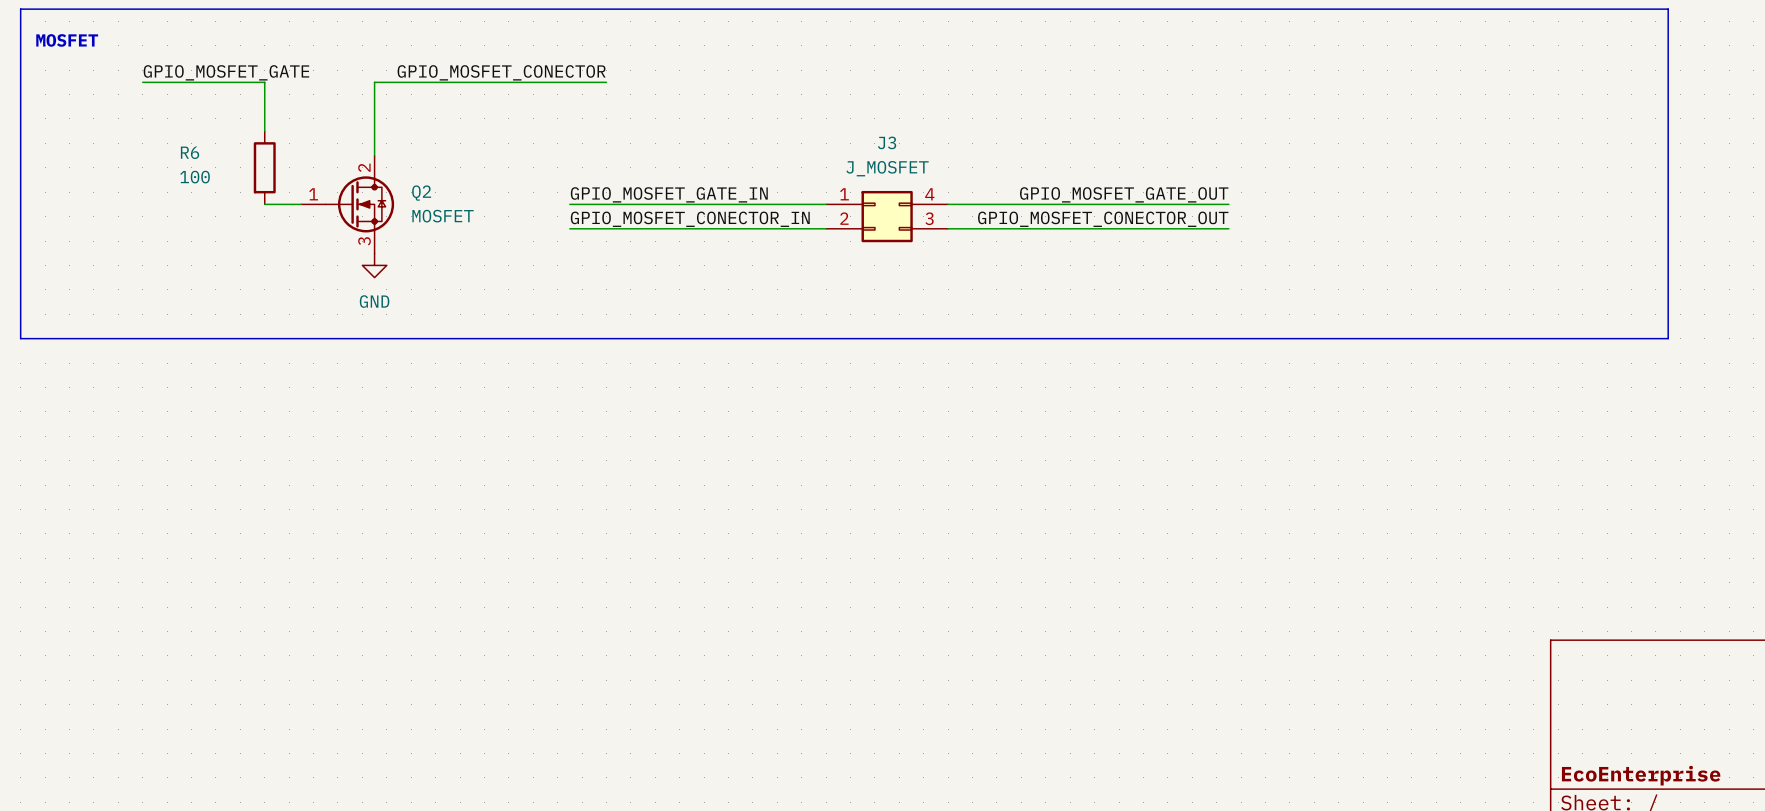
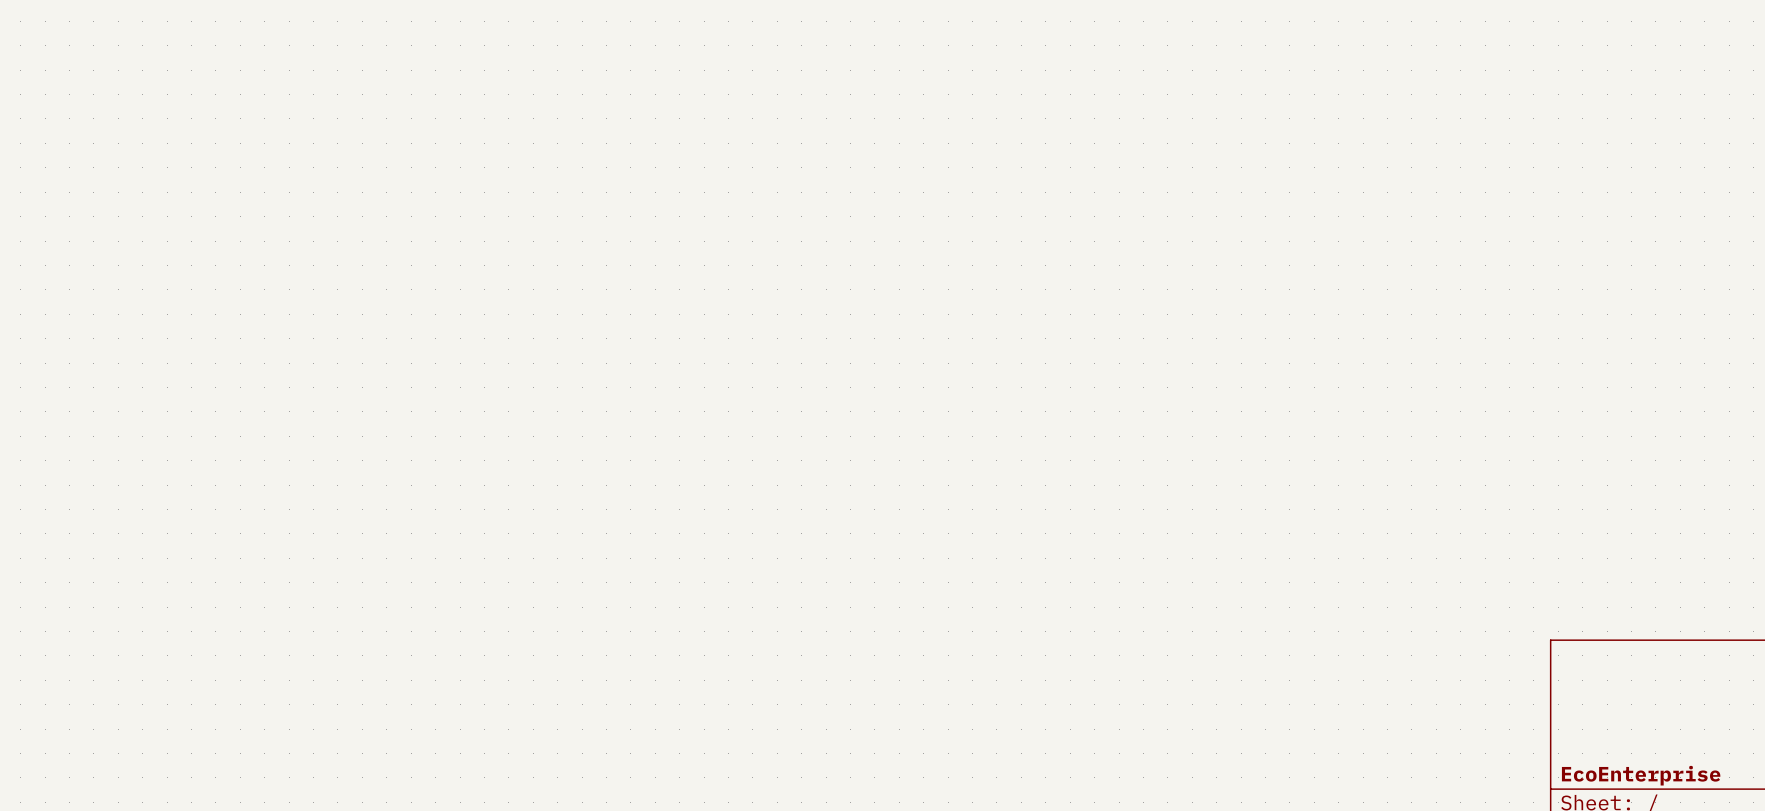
line: (20, 9) (1668, 9) (1668, 338) (20, 338) (20, 9) -> none
text: MOSFET (67, 40) -> none
label: GPIO_MOSFET_GATE (226, 72) -> none
label: GPIO_MOSFET_CONECTOR (501, 72) -> none
wire: (142, 82) (264, 82) (264, 131) -> none
wire: (606, 82) (374, 82) (374, 155) -> none
R6: 100 (264, 167) -> none
label: GPIO_MOSFET_GATE_IN (669, 194) -> none
label: GPIO_MOSFET_GATE_OUT (1124, 194) -> none
wire: (264, 204) (301, 204) -> none
Q2: MOSFET (347, 204) -> none
wire: (569, 204) (826, 204) -> none
wire: (948, 204) (1228, 204) -> none
J3: J_MOSFET (887, 216) -> none
label: GPIO_MOSFET_CONECTOR_IN (690, 219) -> none
label: GPIO_MOSFET_CONECTOR_OUT (1103, 219) -> none
wire: (569, 228) (826, 228) -> none
wire: (948, 228) (1228, 228) -> none
power symbol: GND (374, 265) -> none

